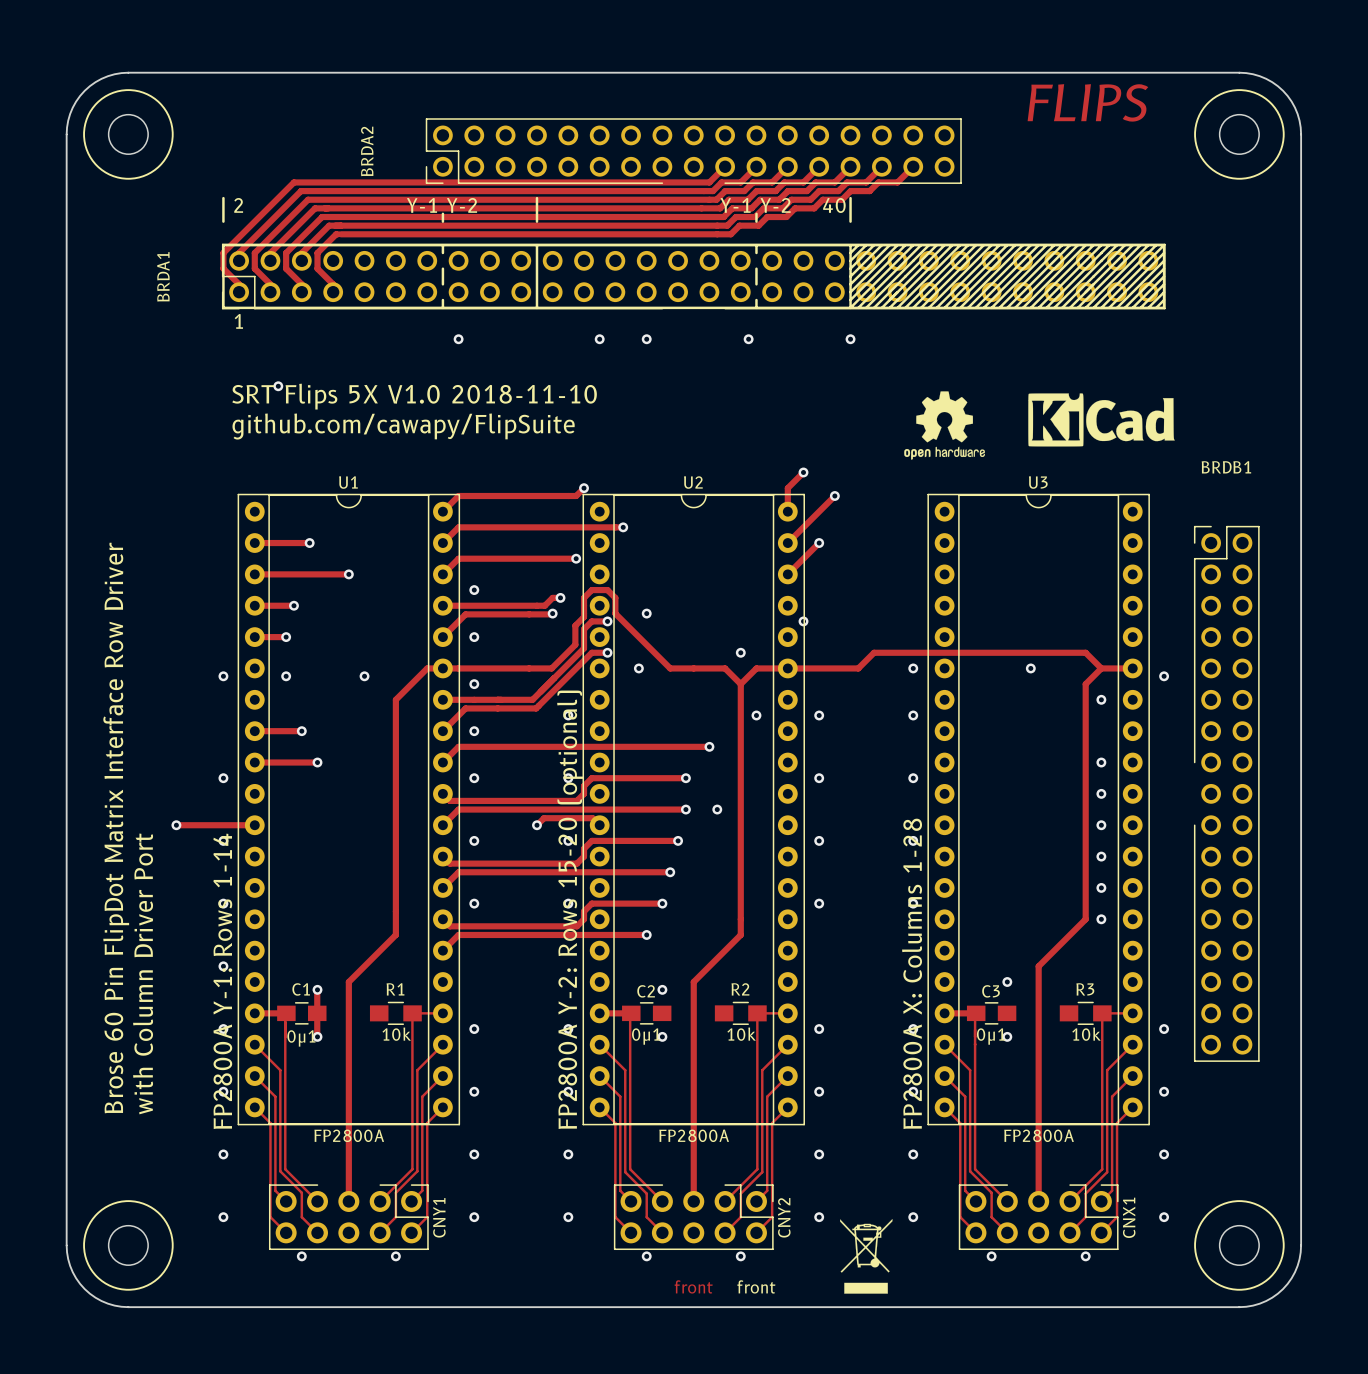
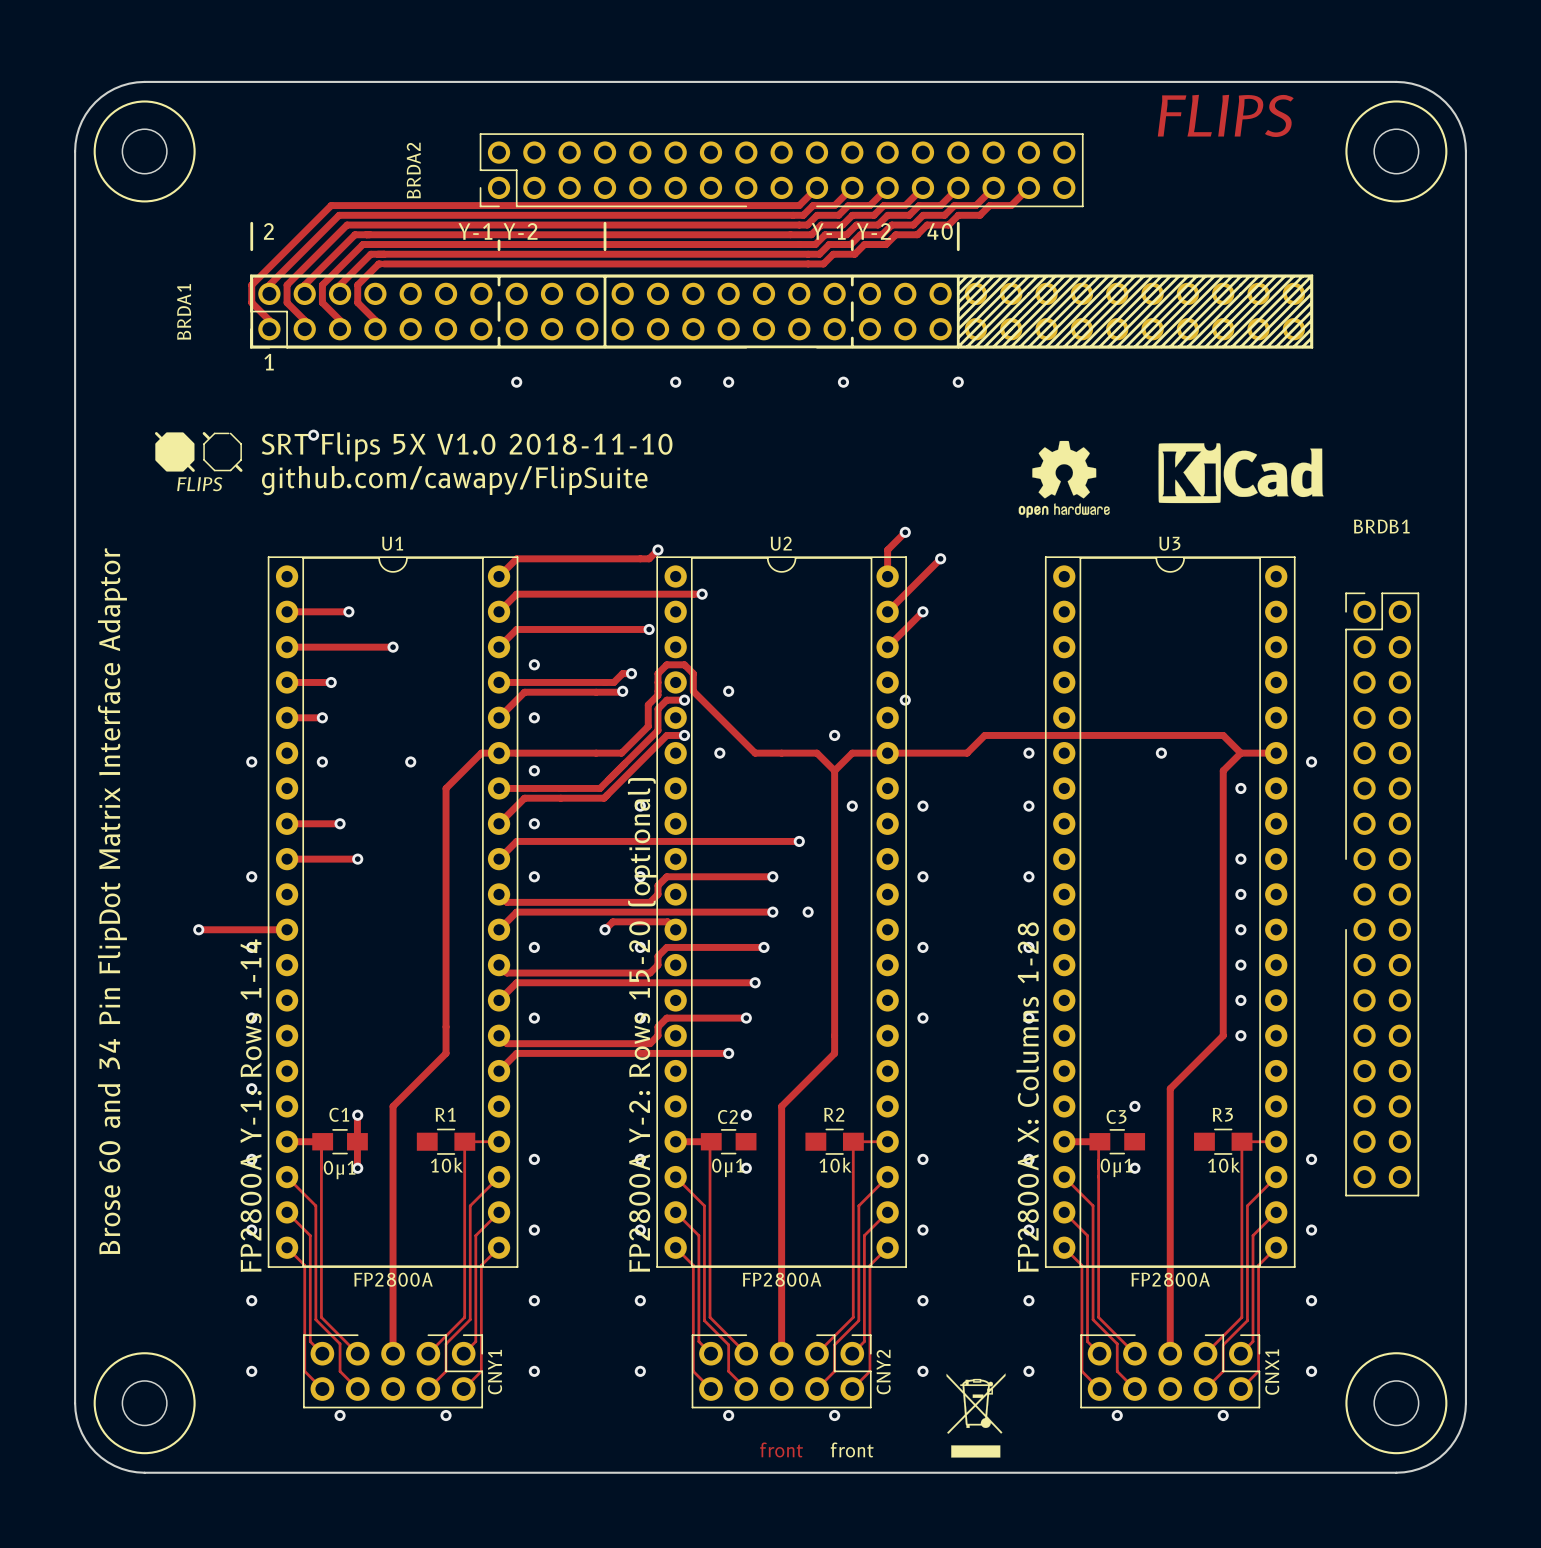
drawing: none -> [154, 432, 243, 472]
text: Brose 60 Pin FlipDot Matrix Interface Row Driver (116, 828) -> Brose 60 and 34 Pin FlipDot Matrix Interface Adaptor (112, 901)
text: with Column Driver Port (143, 973) -> none

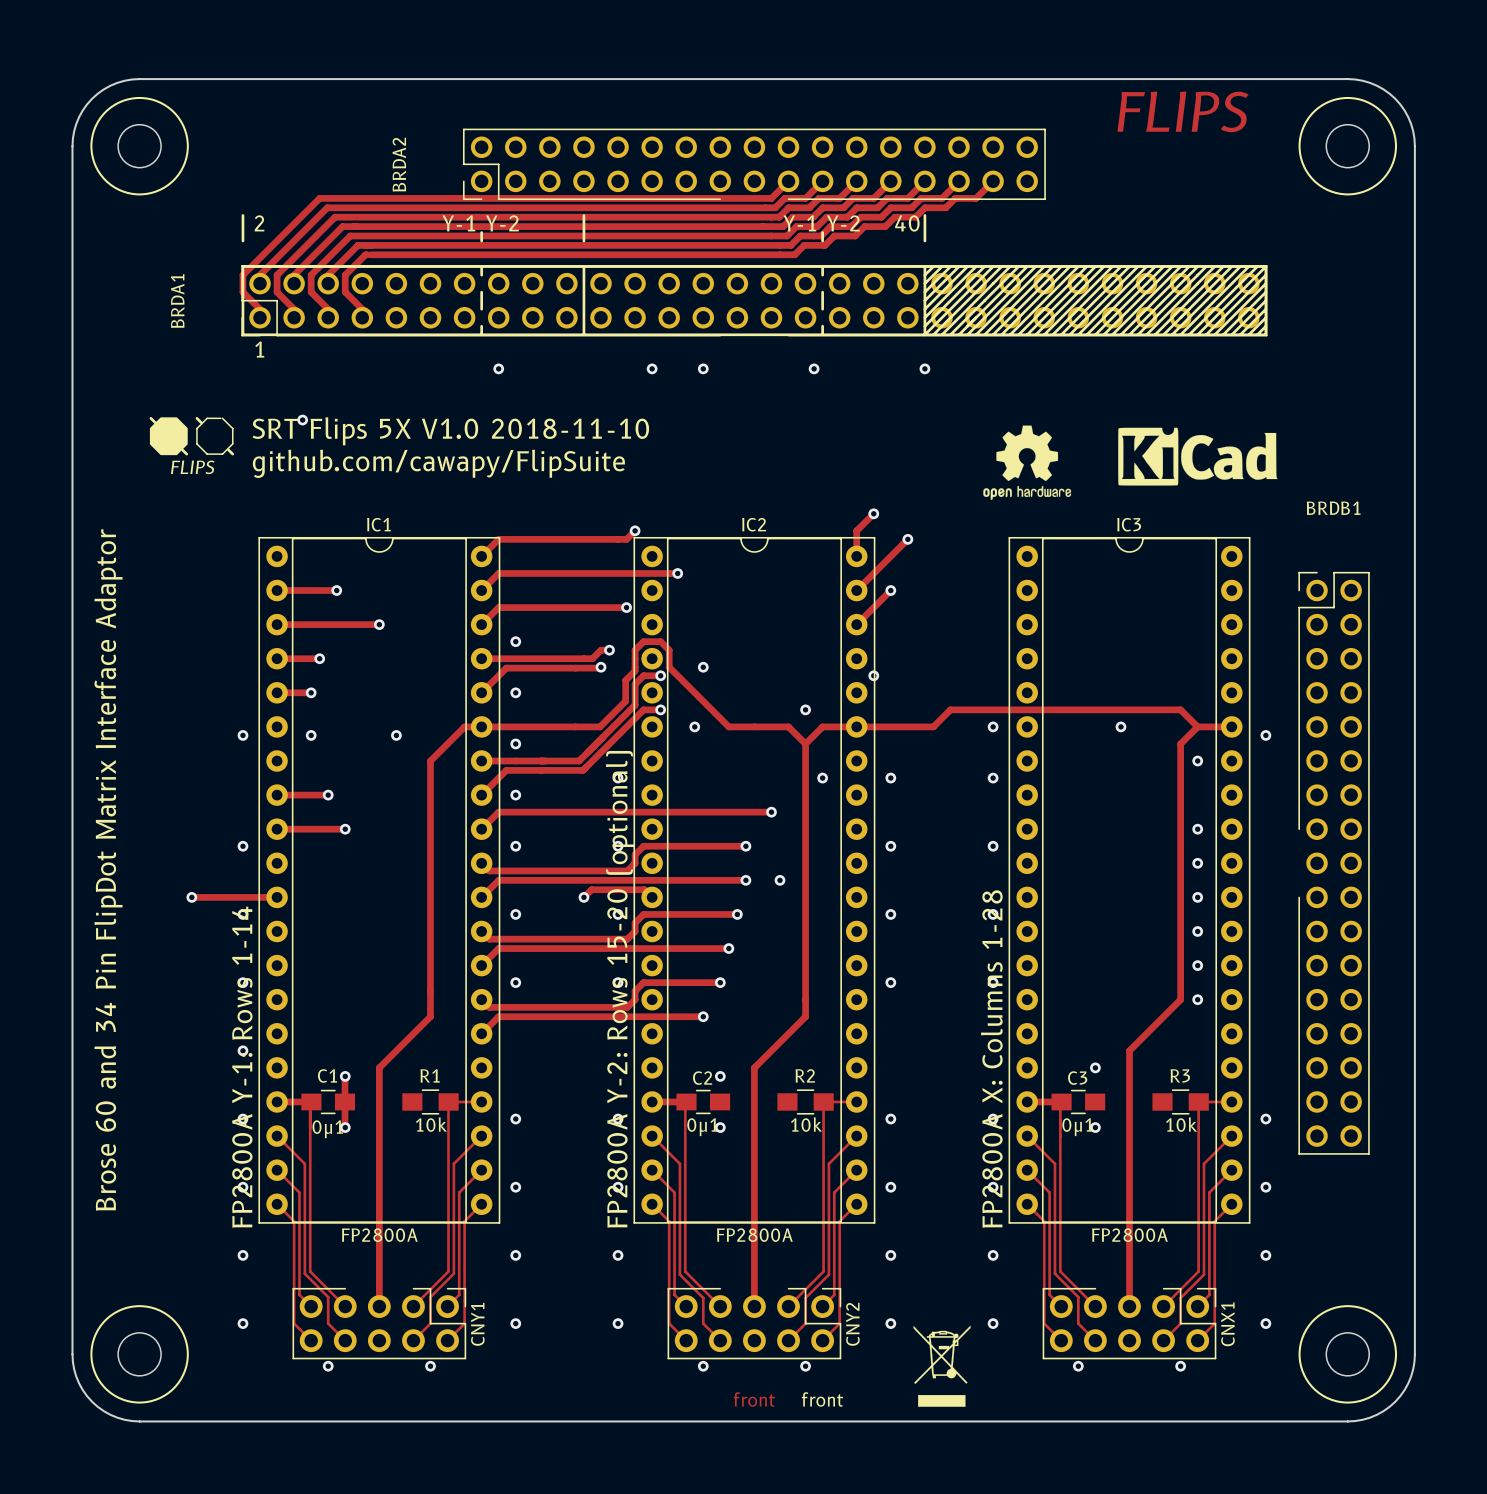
U1 name: U1 (392, 543) -> IC1 (378, 524)
U2 name: U2 (781, 543) -> IC2 (754, 524)
U3 name: U3 (1169, 543) -> IC3 (1129, 524)

